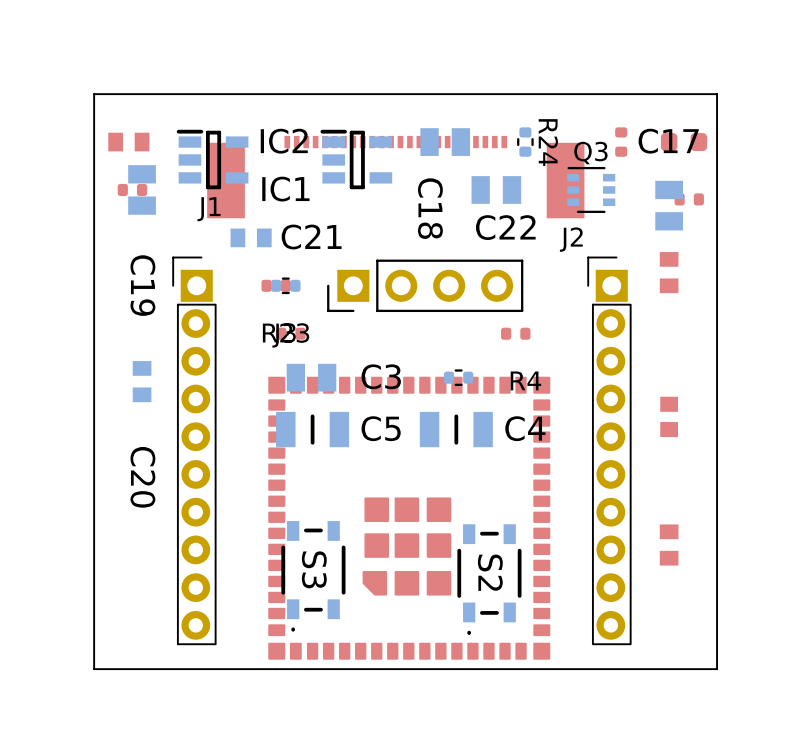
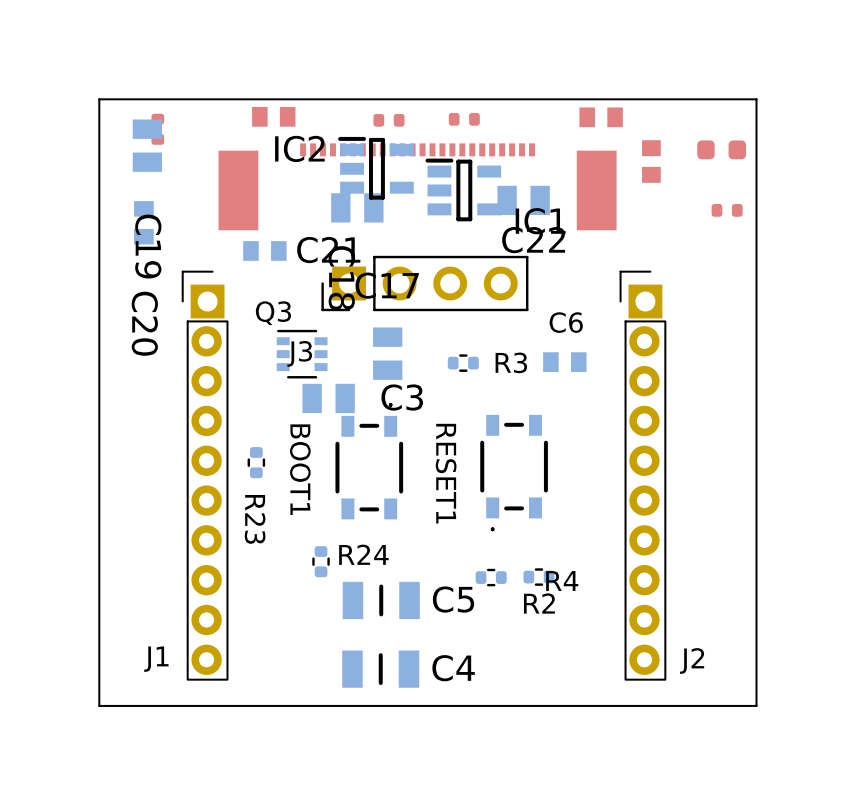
part: none -> (273, 116)
part: none -> (464, 119)
part: none -> (388, 120)
part: none -> (157, 129)
part footprint: [615, 127, 628, 157] -> [642, 140, 661, 183]
C6 side: top (128, 142) -> bottom (564, 362)
C18 position: (445, 142) -> (357, 207)
R24 position: (525, 142) -> (321, 561)
R24 name rotation: 0° (548, 142) -> 90° counterclockwise (363, 554)
Q3 name position: Q3 (590, 153) -> Q3 (273, 313)
IC1 position: (212, 159) -> (463, 189)
R3 side: top (132, 189) -> bottom (463, 363)
C19 position: (142, 189) -> (147, 145)
Q3 position: (591, 189) -> (302, 354)
C17 position: (669, 205) -> (387, 353)
J1 name position: J1 (209, 209) -> J1 (156, 659)
J2 name position: J2 (571, 239) -> J2 (692, 660)
part rotation: 0° (669, 272) -> 90° clockwise (601, 117)
part position: (669, 272) -> (601, 117)
part: (276, 285) -> none
R23 rotation: 0° (285, 285) -> 90° clockwise (256, 462)
R23 position: (285, 285) -> (256, 462)
J3 position: (425, 285) -> (424, 283)
part: (290, 333) -> none
part: (515, 333) -> none
drawing: [268, 376, 551, 660] -> none
R4 position: (458, 377) -> (491, 577)
C20 position: (142, 381) -> (143, 222)
part: (669, 416) -> none
C5 position: (312, 429) -> (381, 600)
C4 position: (456, 429) -> (380, 669)
BOOT1: none -> (369, 461)
RESET1: none -> (514, 473)
part: (669, 545) -> none
R2: none -> (538, 577)
S3: (313, 576) -> none
S2: (489, 579) -> none

